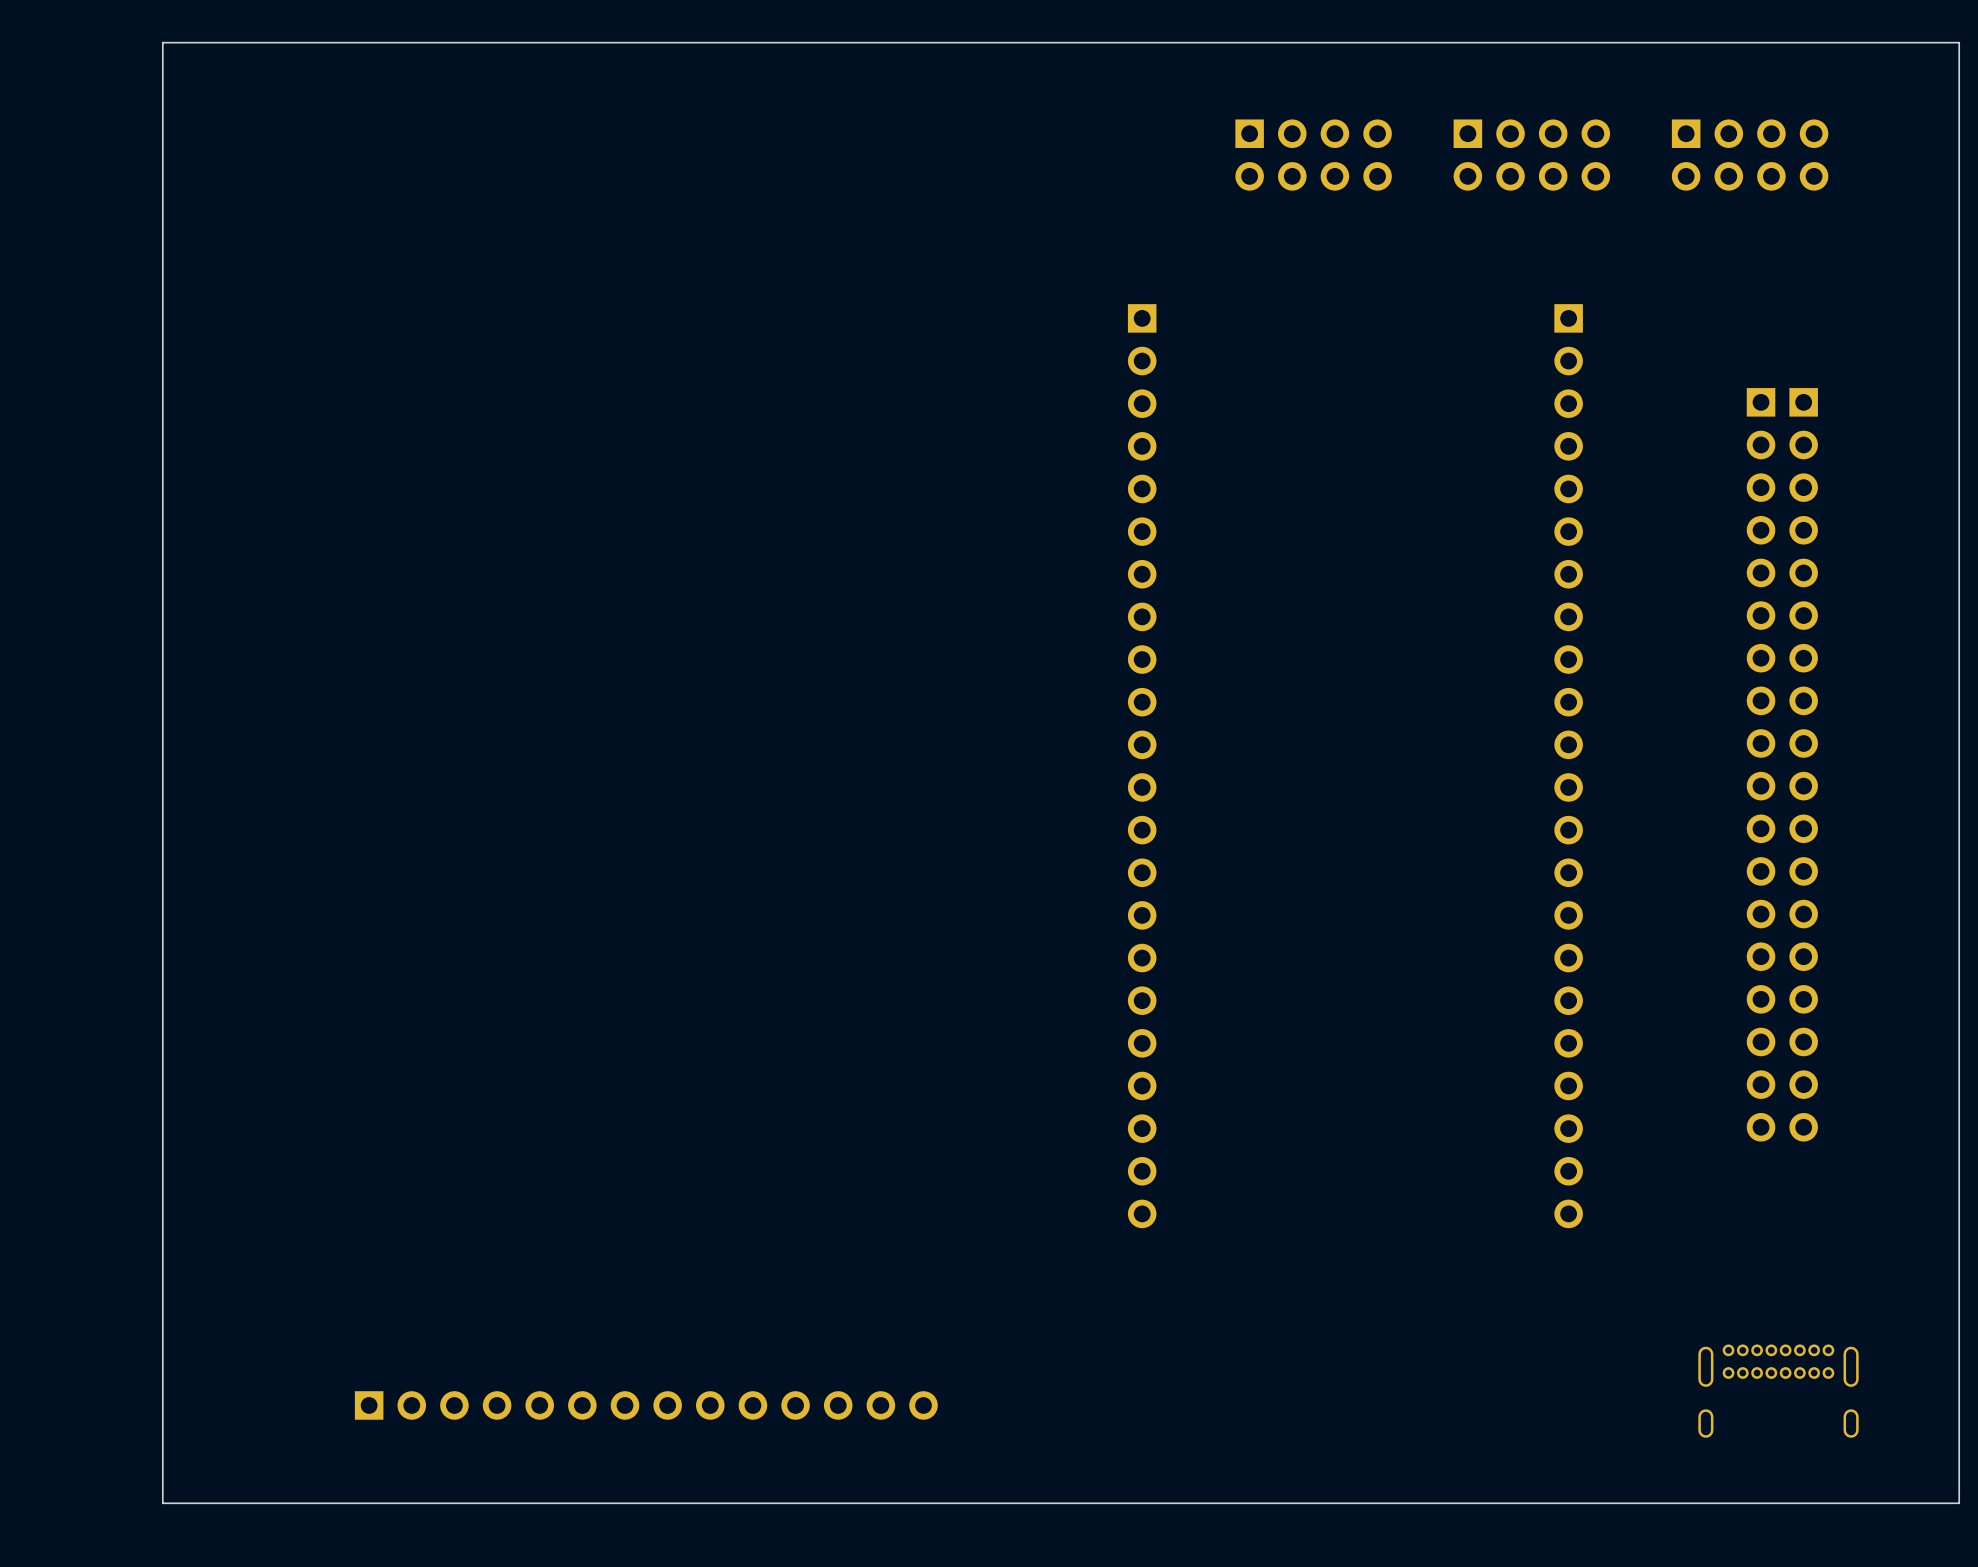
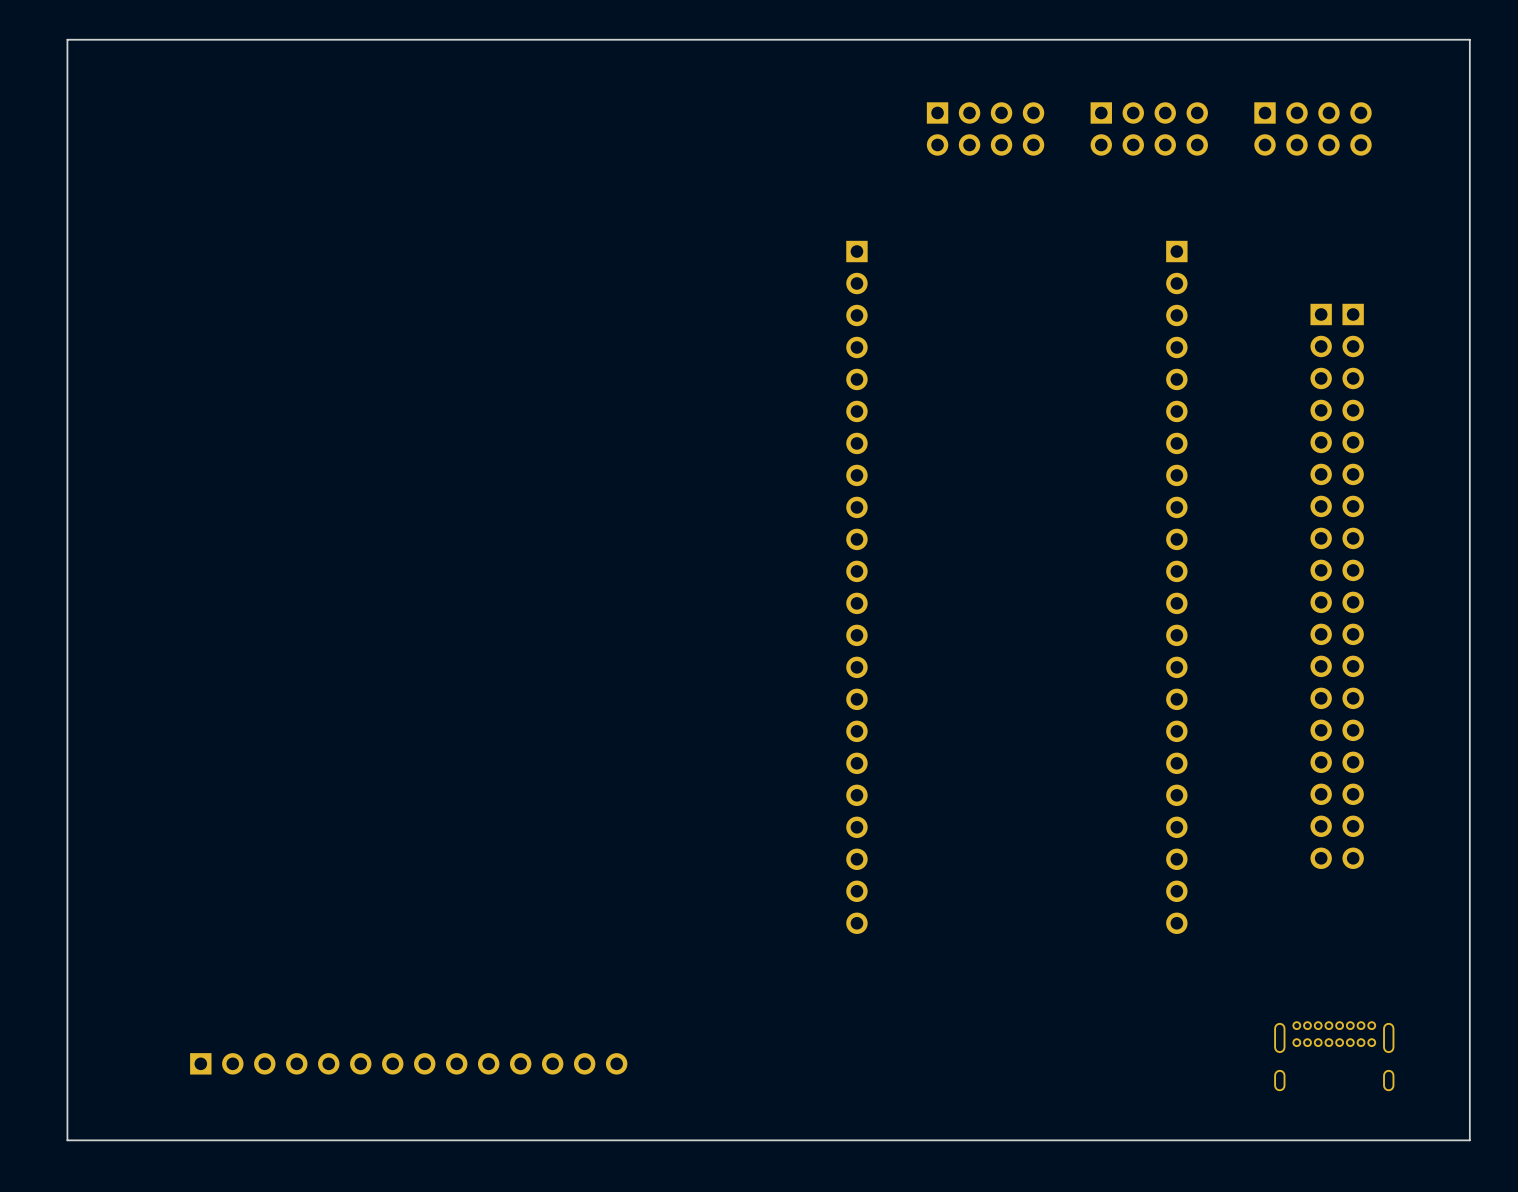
board edge: (1959, 42) (162, 42) (162, 1503) -> (1469, 44) (1469, 39) (67, 39) (67, 1140) (122, 1140)
part position: (646, 1405) -> (408, 1063)

